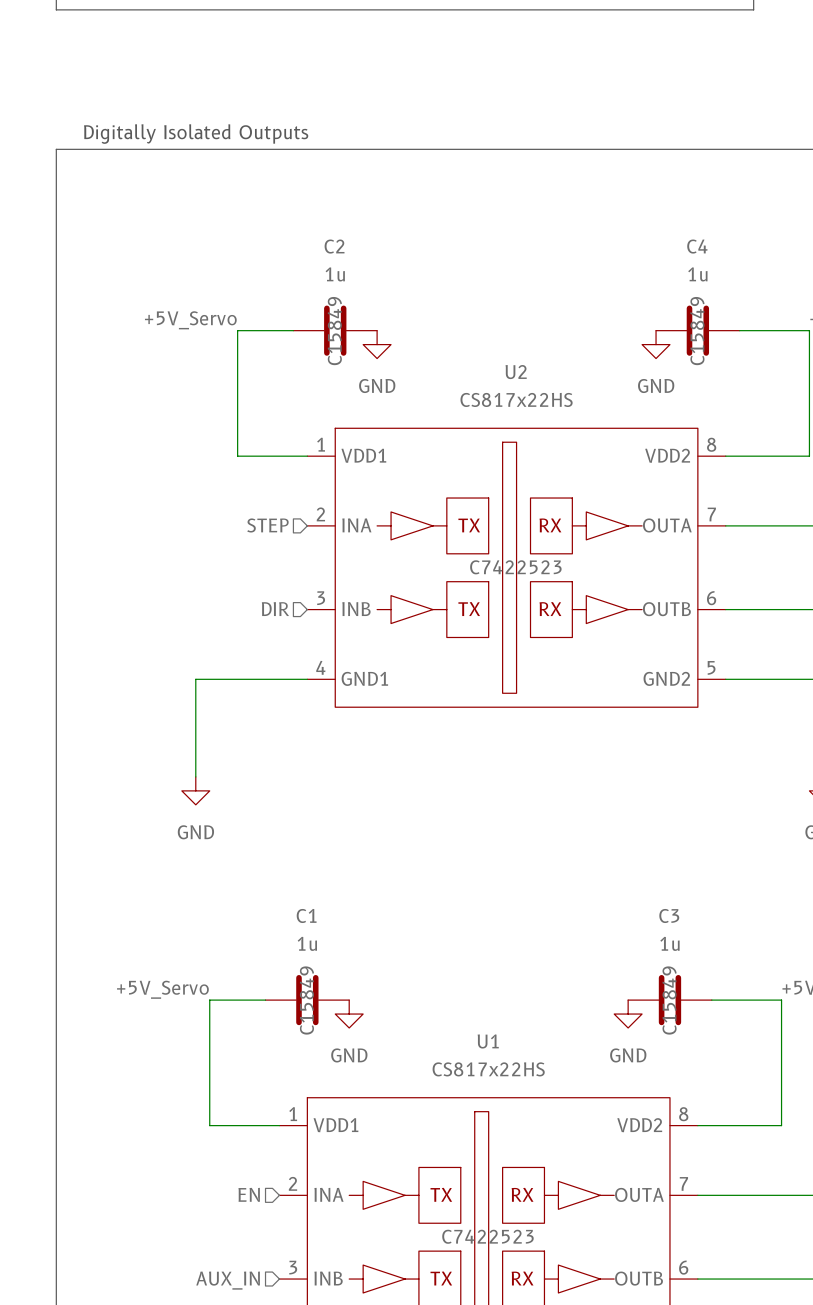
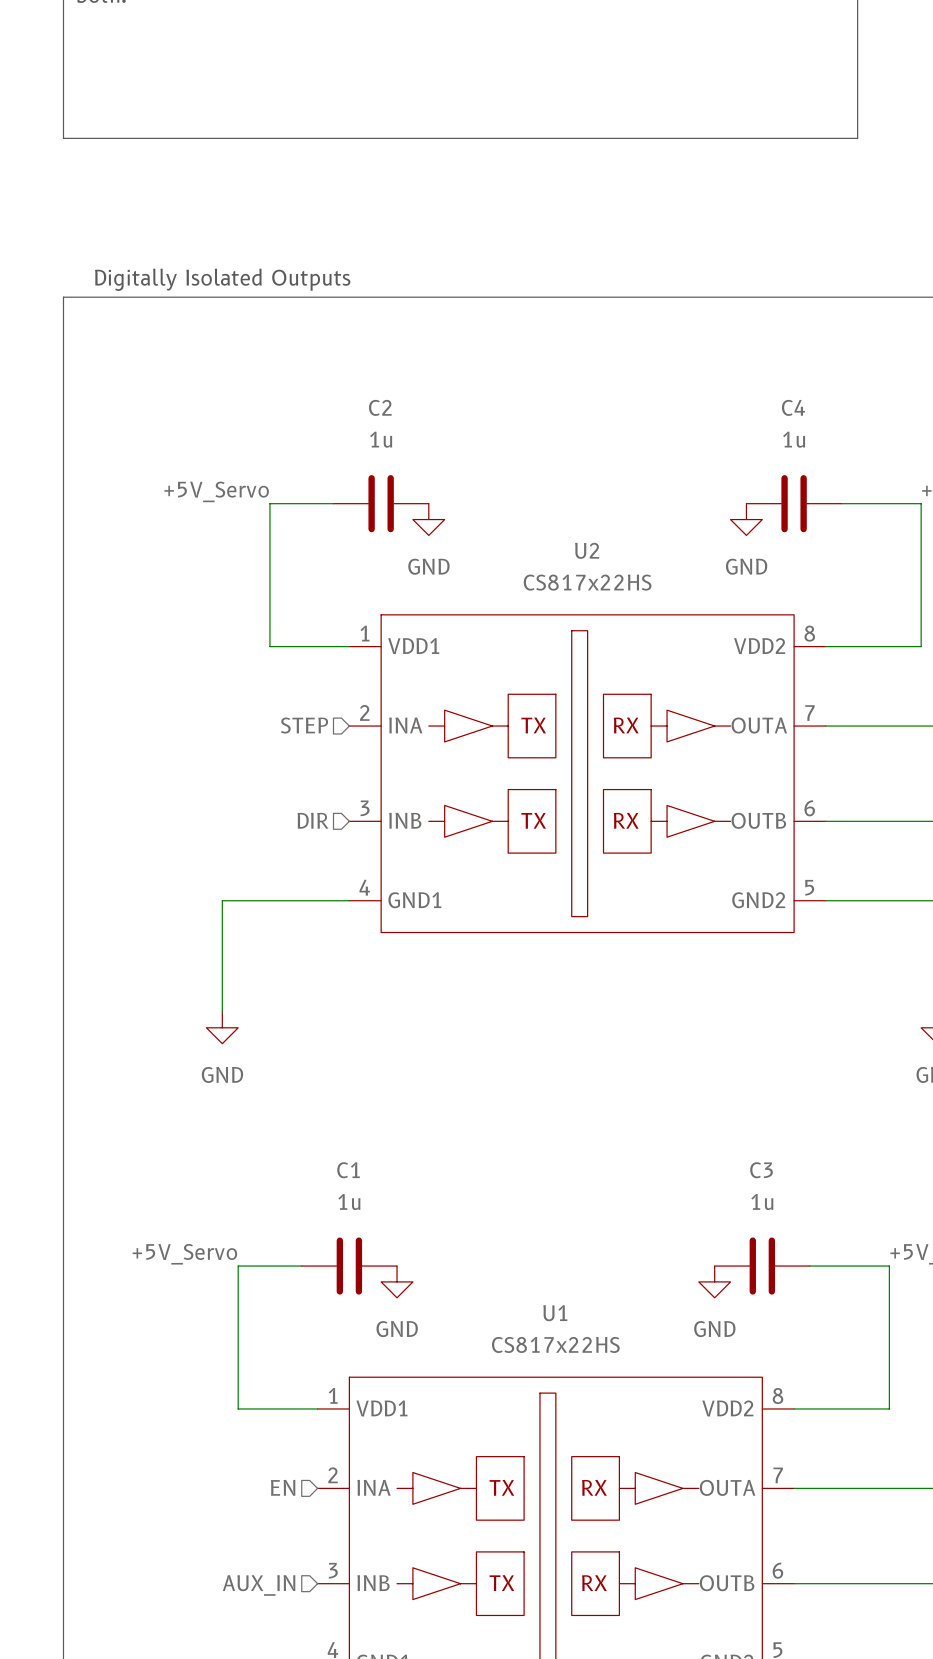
C2 text: C15849 (334, 331) -> none
C4 text: C15849 (697, 331) -> none
U2 text: C7422523 (515, 567) -> none
C1 text: C15849 (306, 1000) -> none
C3 text: C15849 (669, 1000) -> none
U1 text: C7422523 (487, 1236) -> none

